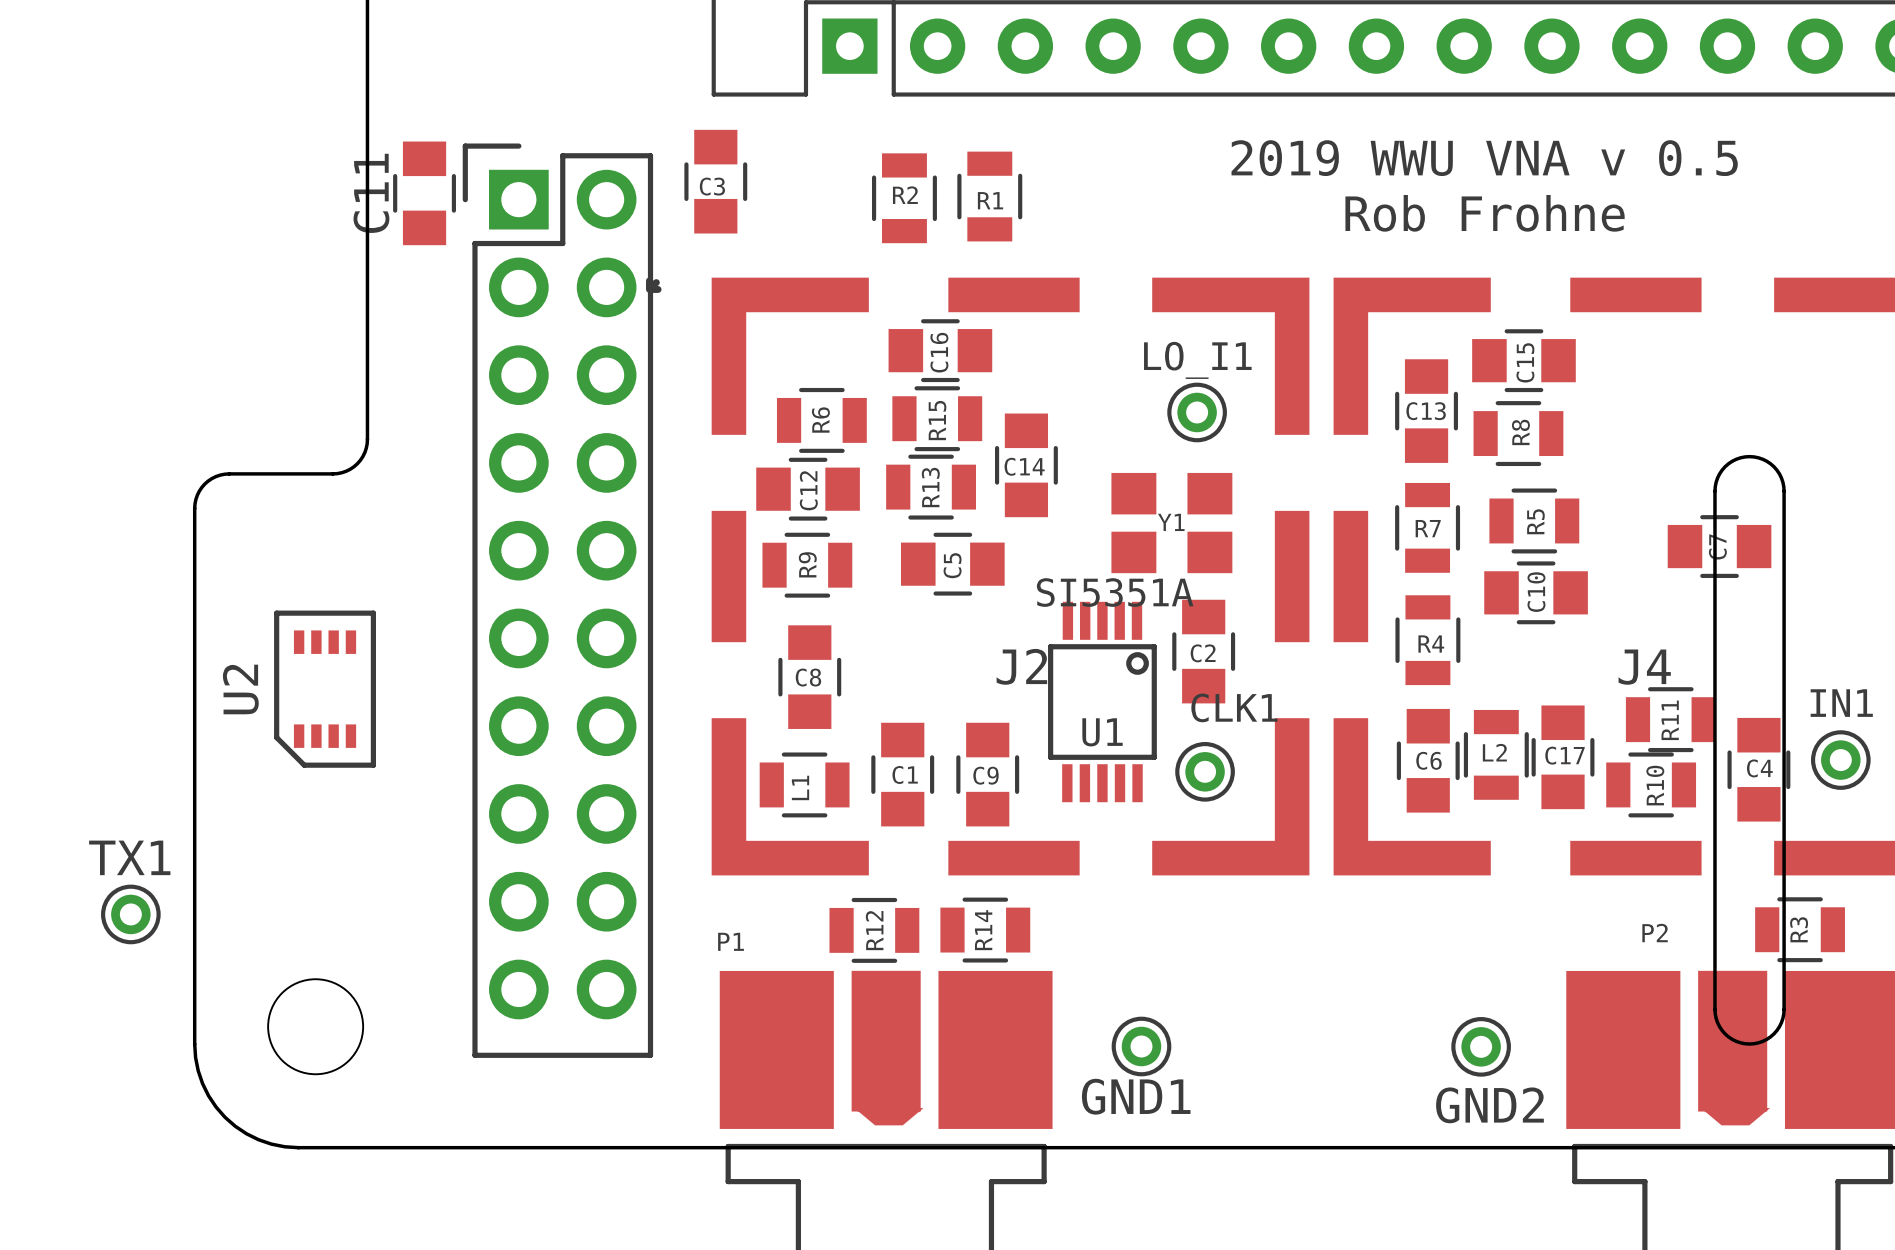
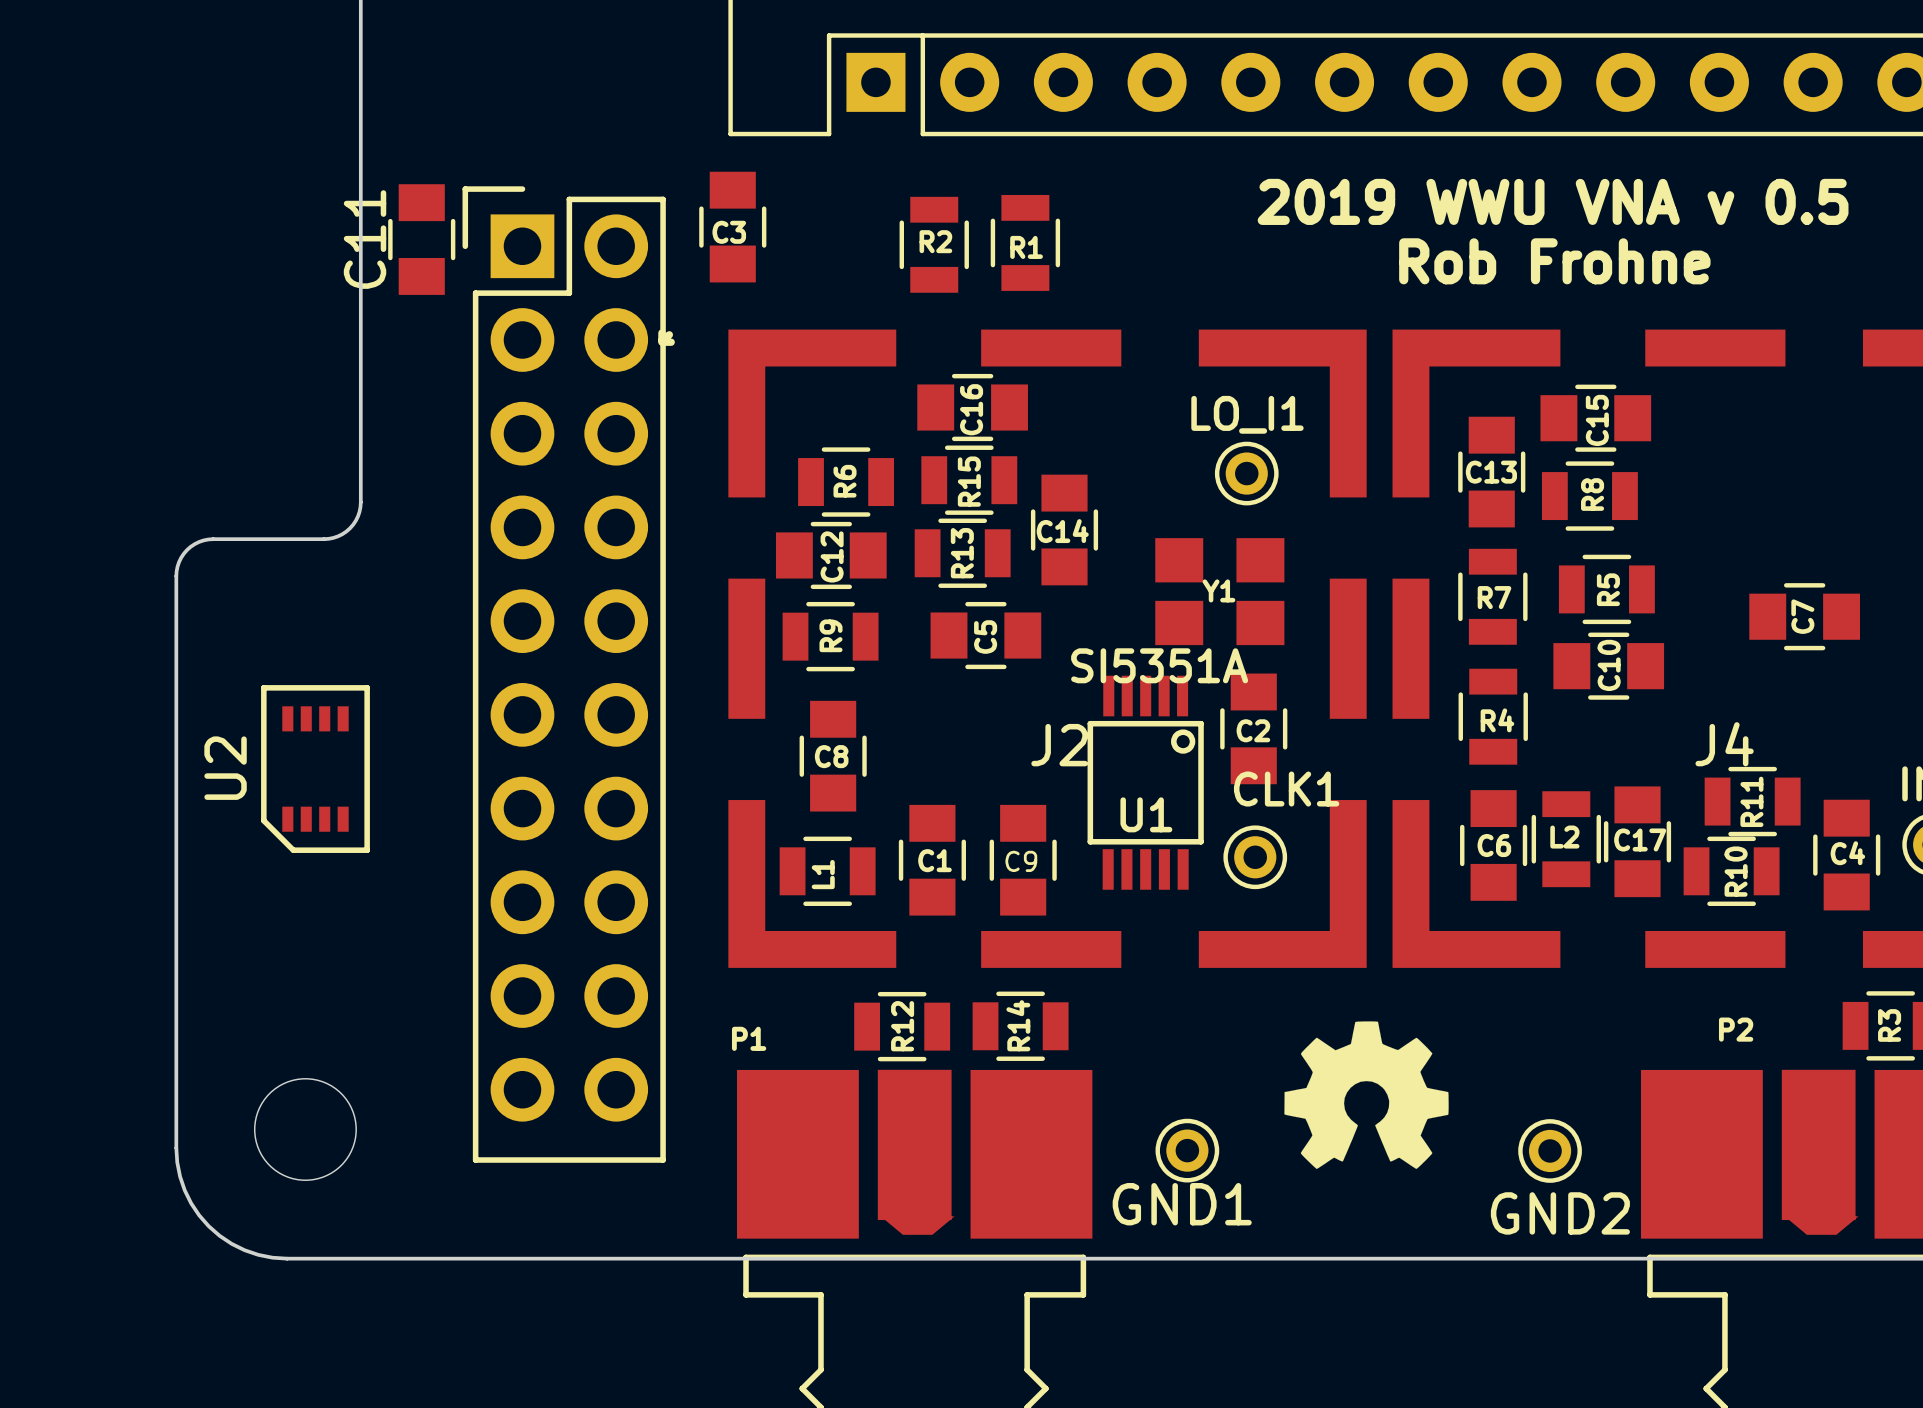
board edge: (1714, 491) (1715, 1013) (1719, 1026) (1728, 1036) (1740, 1042) (1754, 1043) (1766, 1039) (1776, 1030) (1781, 1022) (1784, 1009) (1783, 486) (1779, 473) (1770, 463) (1762, 459) (1749, 456) (1736, 459) (1725, 466) (1717, 477) (1714, 491) -> none
TX1: (130, 914) -> none
drawing: none -> [1284, 1021, 1449, 1170]

